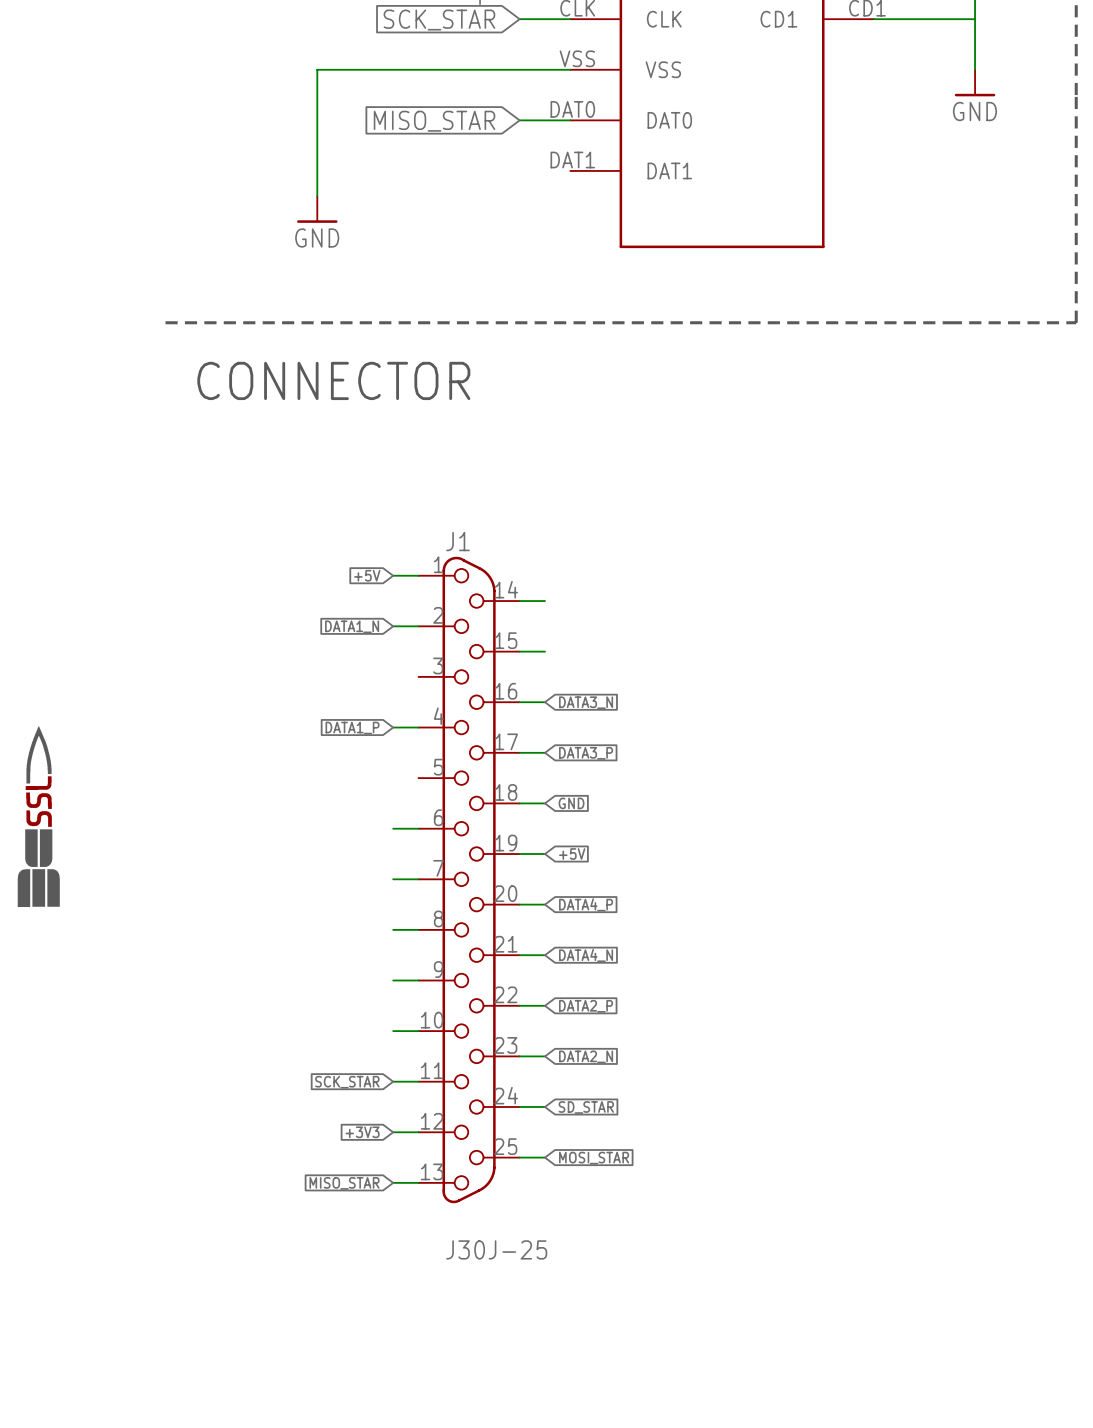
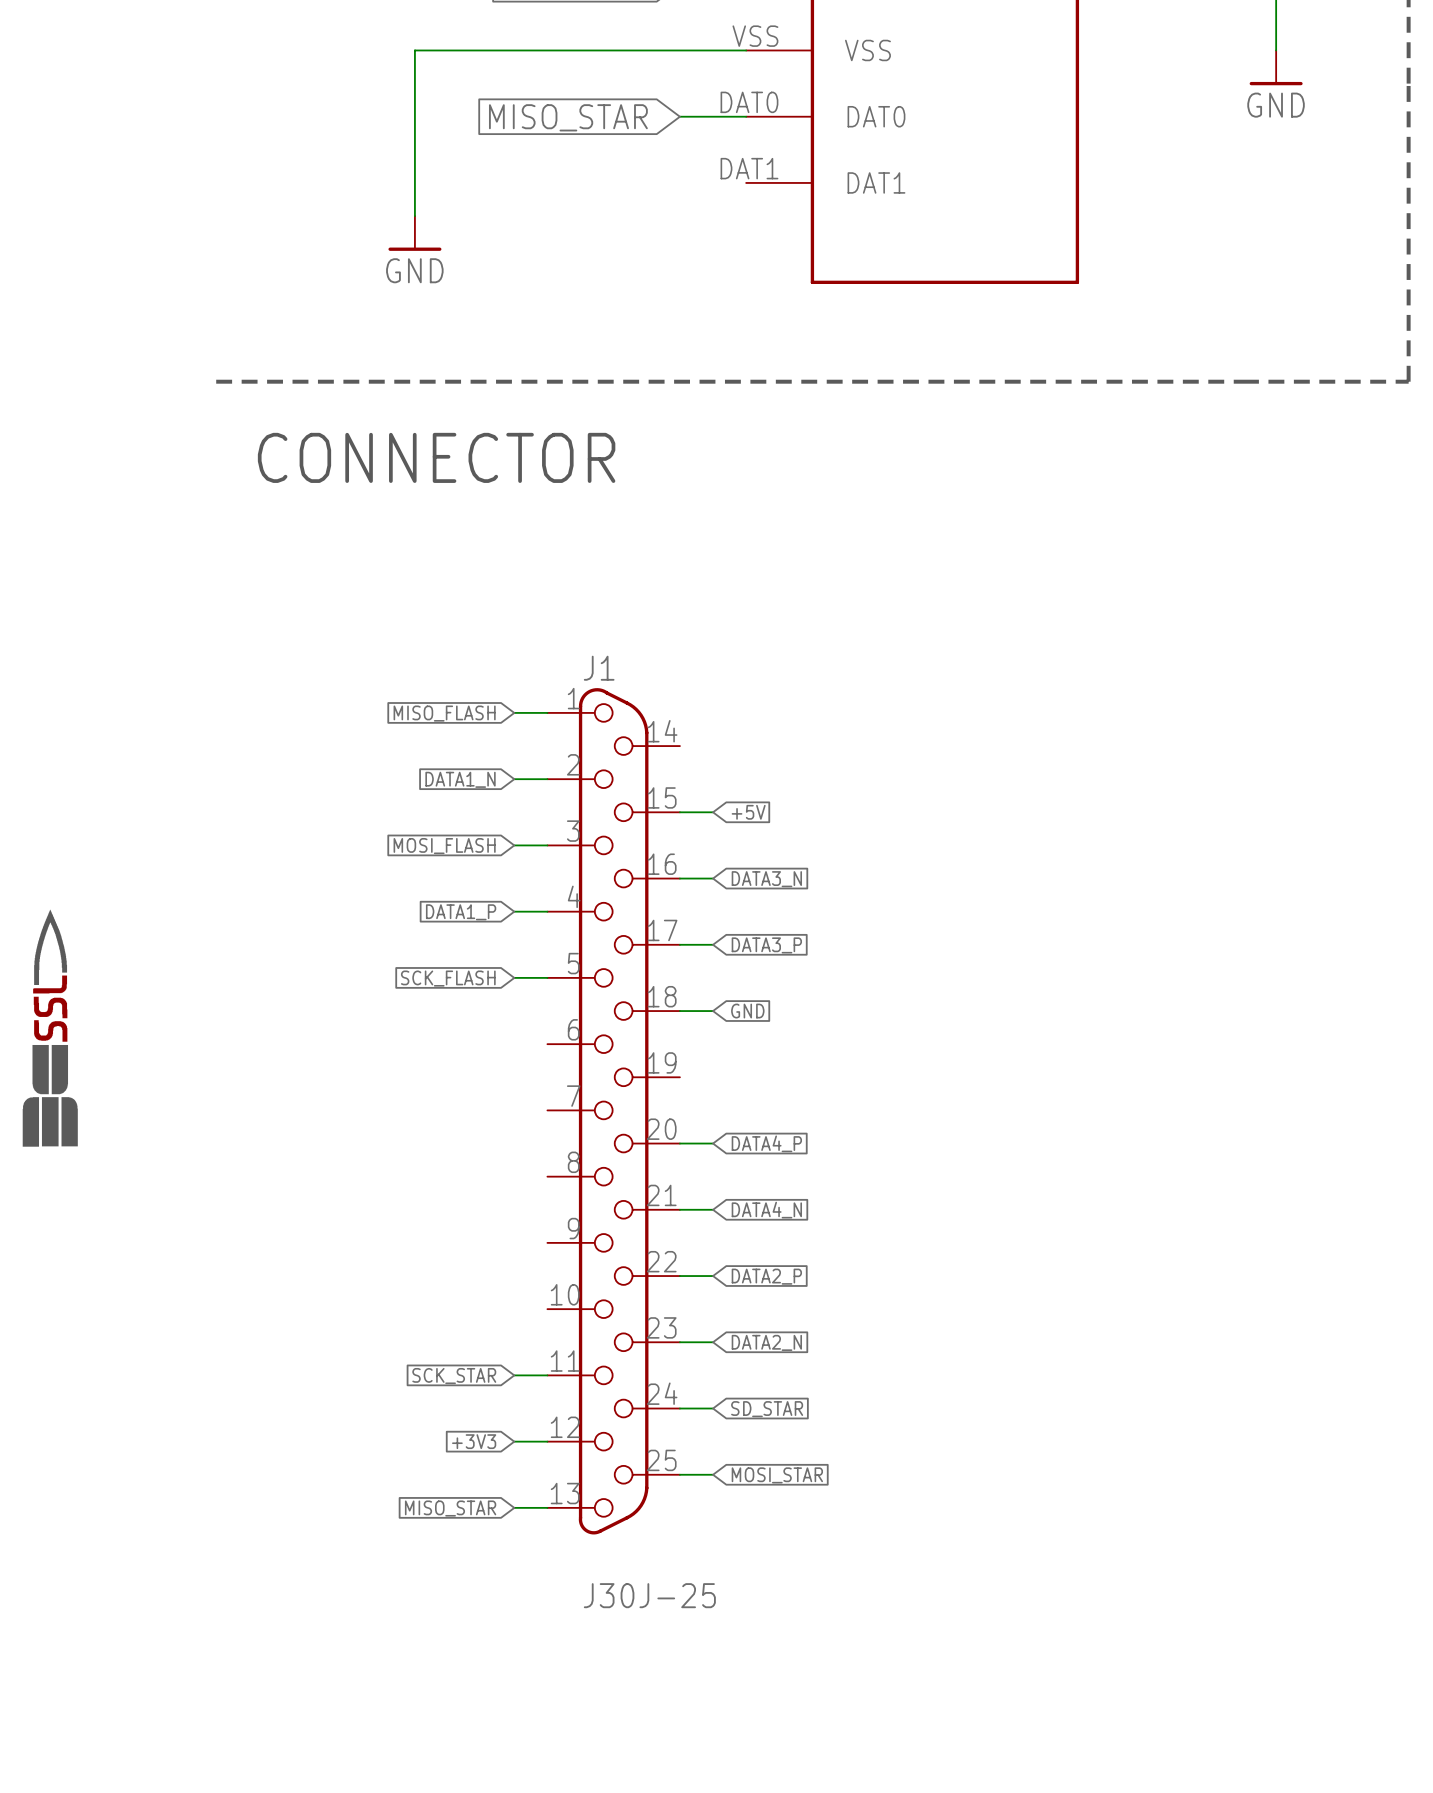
global label: +5V (367, 575) -> MISO_FLASH (444, 713)
wire: (519, 601) (544, 601) -> (514, 845) (547, 845)
global label: none -> MOSI_FLASH (444, 846)
global label: none -> SCK_FLASH (448, 978)
wire: (393, 828) (418, 828) -> (514, 977) (547, 977)
wire: (519, 854) (544, 854) -> none
global label position: +5V (572, 854) -> +5V (748, 812)
wire: (393, 879) (418, 879) -> none
wire: (393, 929) (418, 929) -> none
wire: (393, 980) (418, 980) -> none
wire: (393, 1031) (418, 1031) -> none

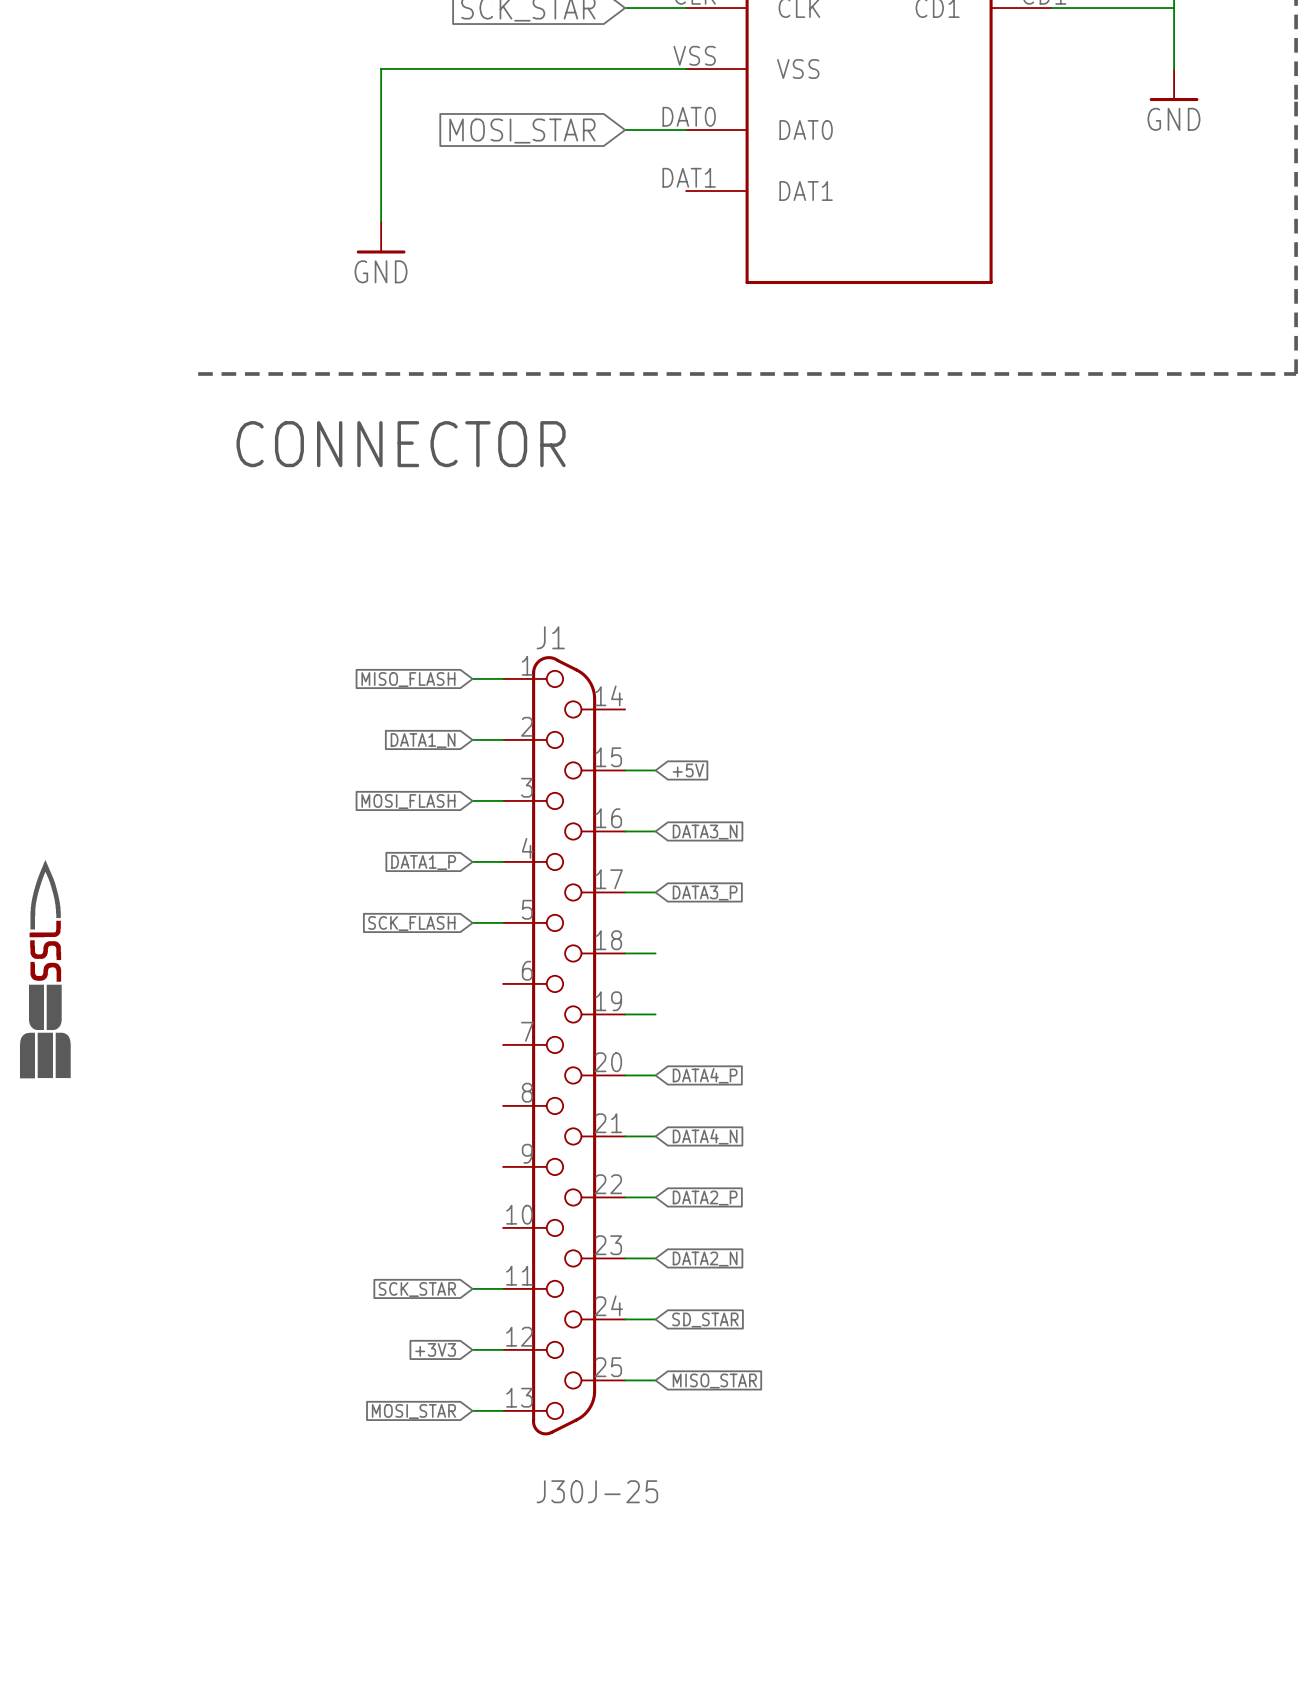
global label: MISO_STAR (568, 117) -> MOSI_STAR (522, 131)
global label: GND (747, 1011) -> none
wire: none -> (625, 1014) (655, 1014)
global label: MOSI_STAR (777, 1475) -> MISO_STAR (714, 1381)
global label: MISO_STAR (450, 1508) -> MOSI_STAR (413, 1411)

